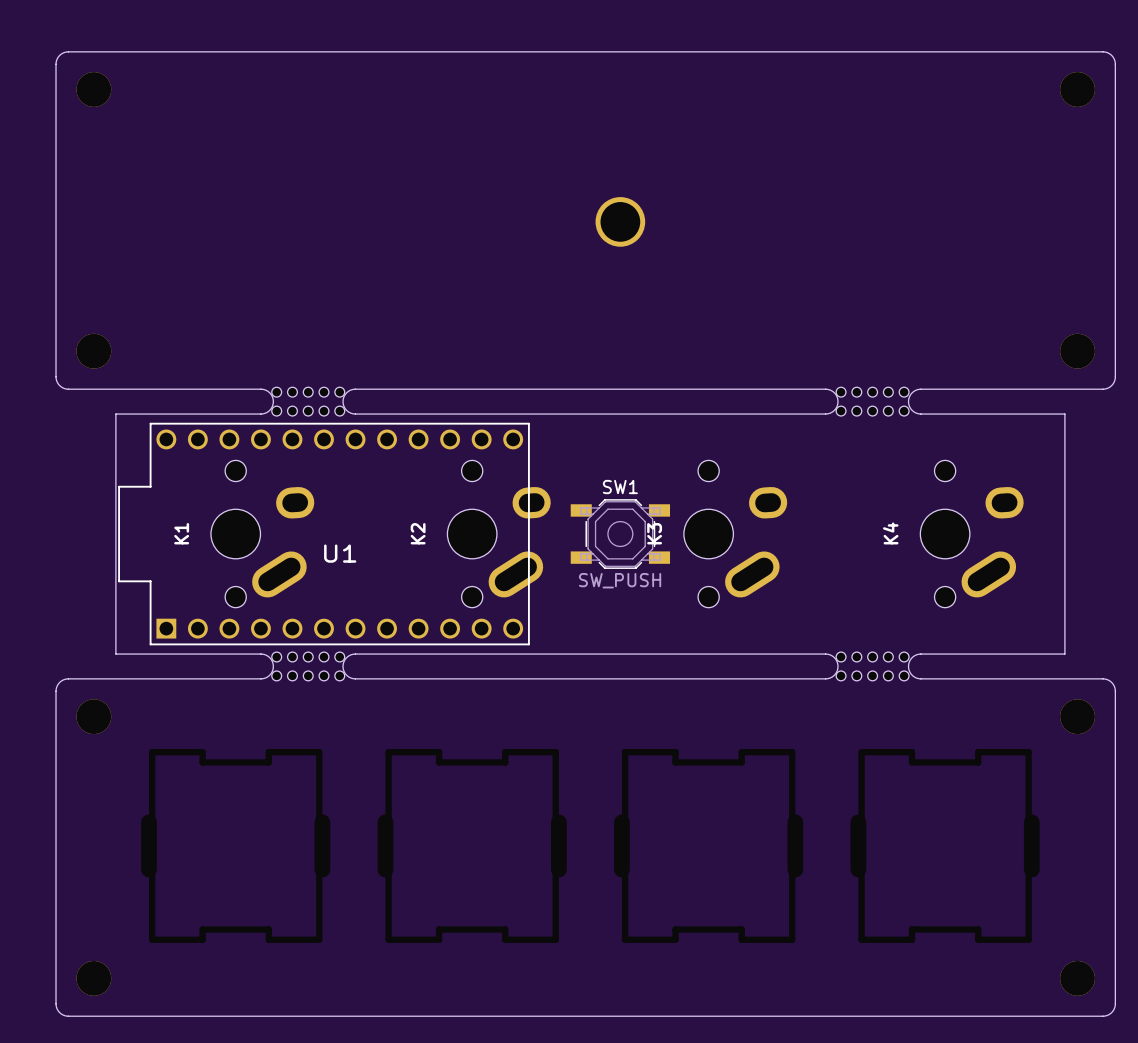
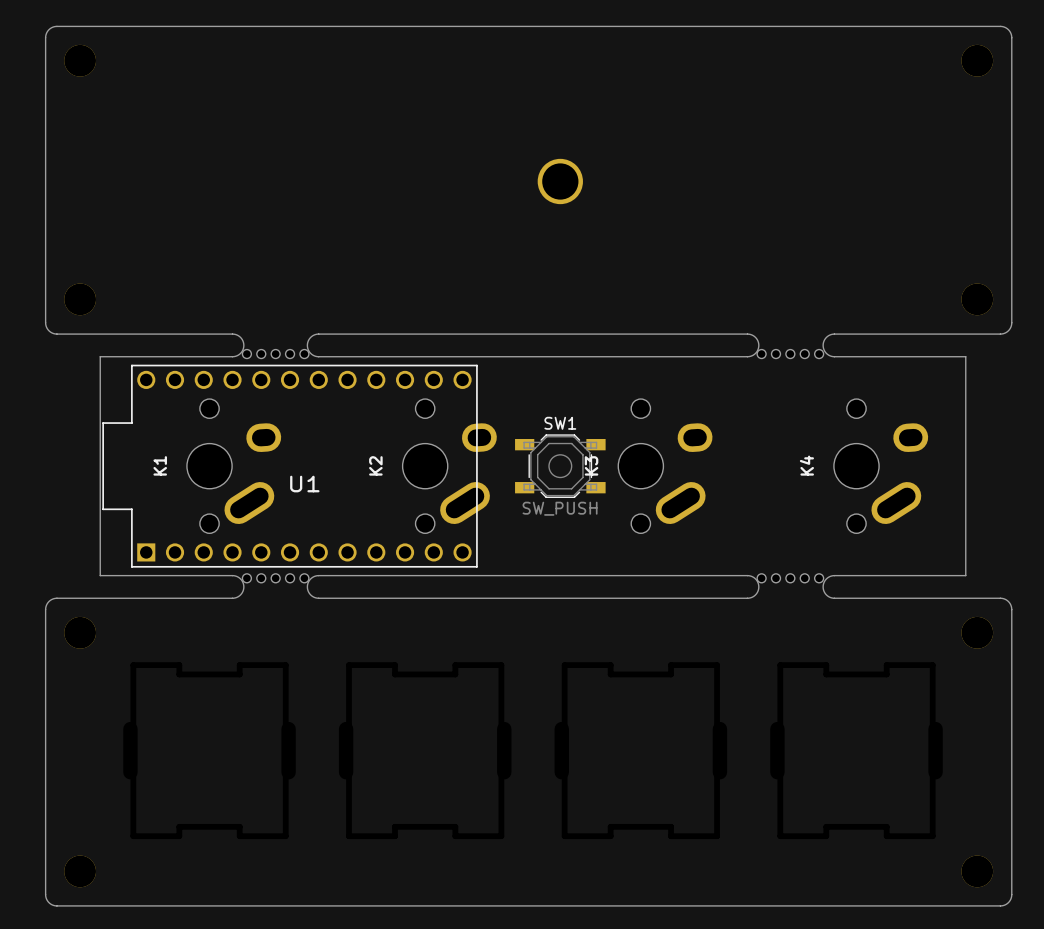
part: (308, 392) -> none
part: (872, 392) -> none
part: (308, 675) -> none
part: (872, 675) -> none

